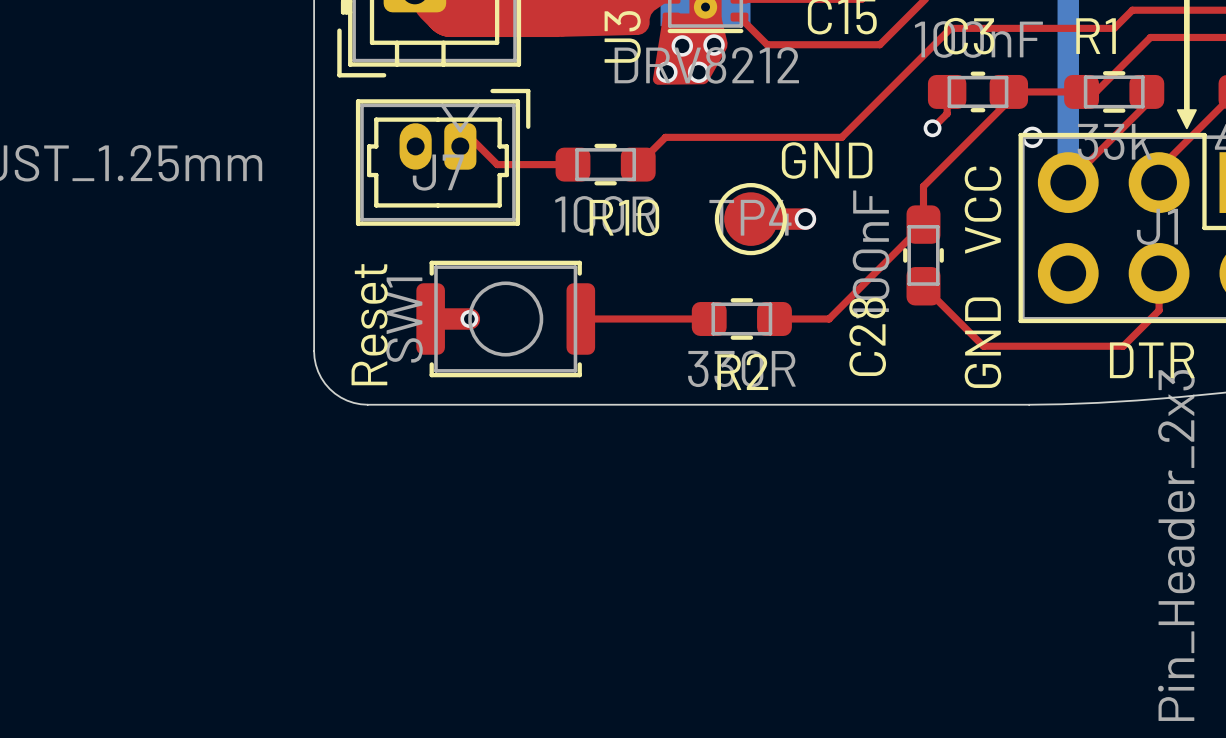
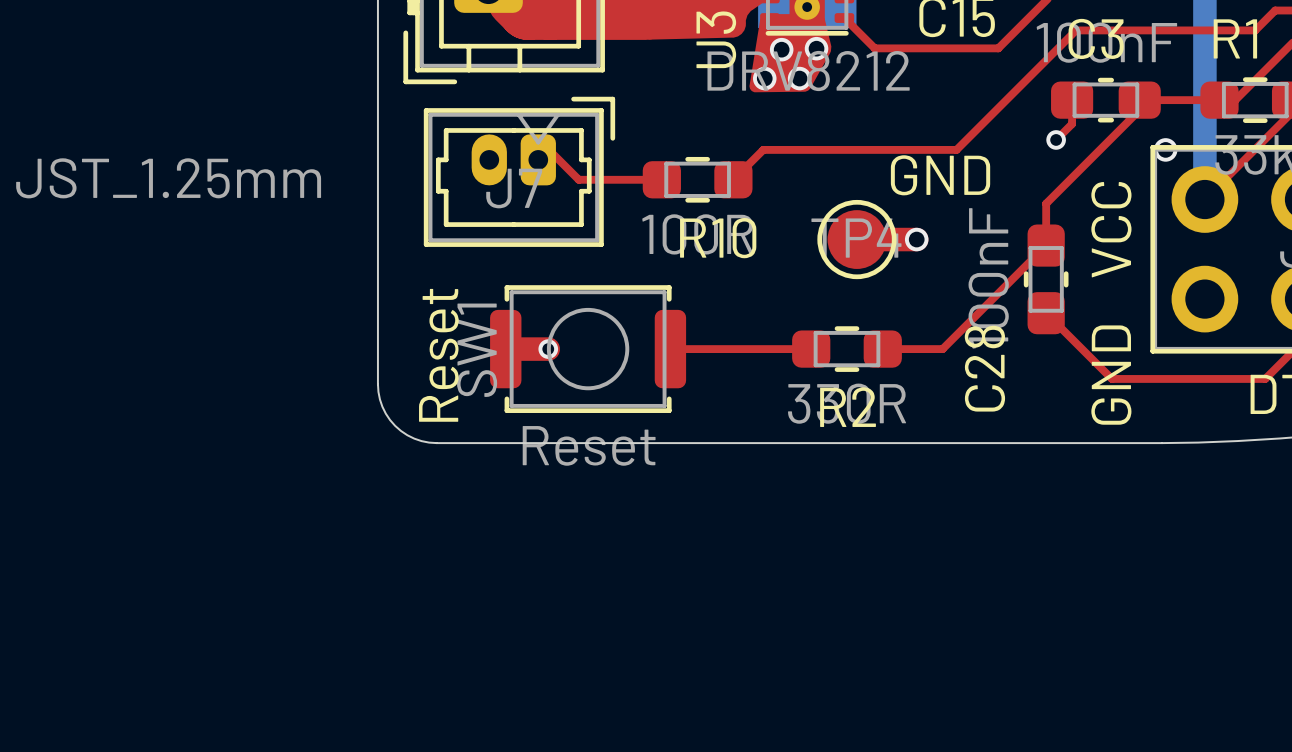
SW1 value: none -> Reset (589, 445)

